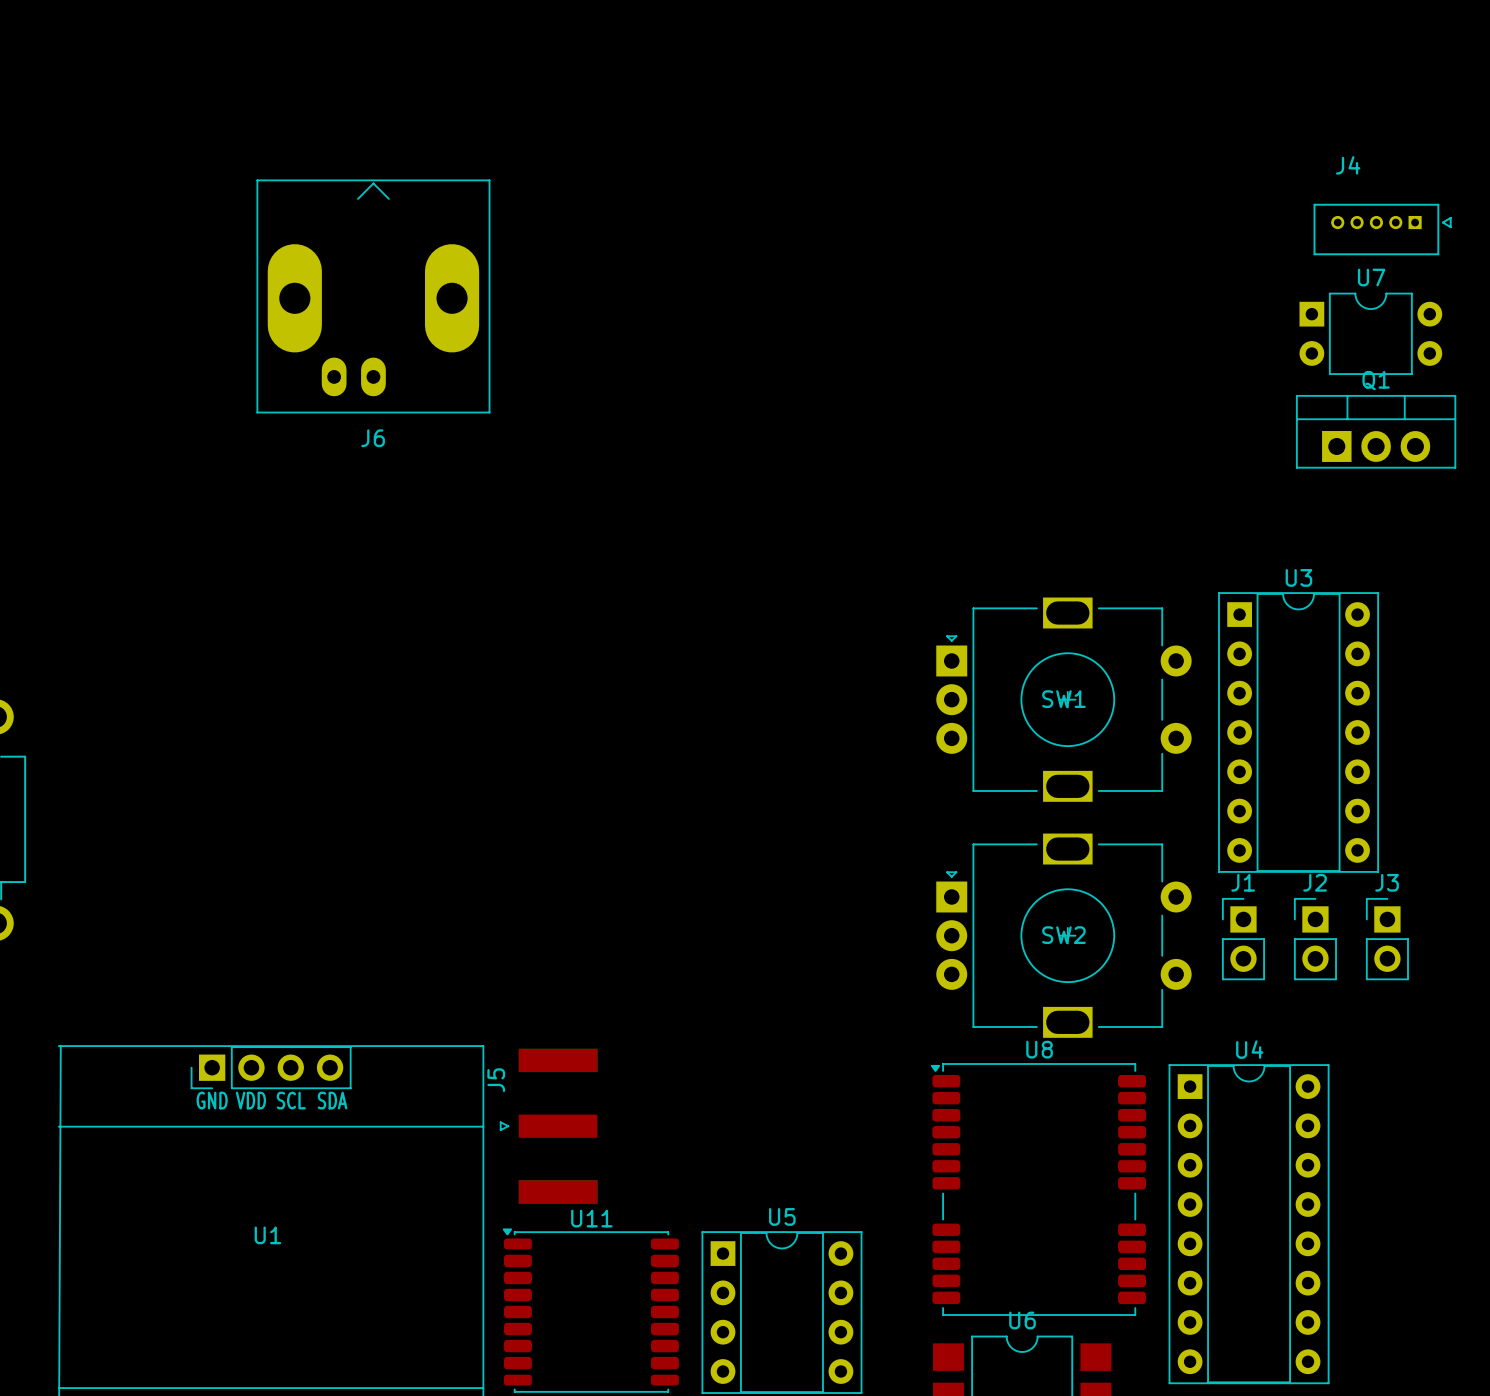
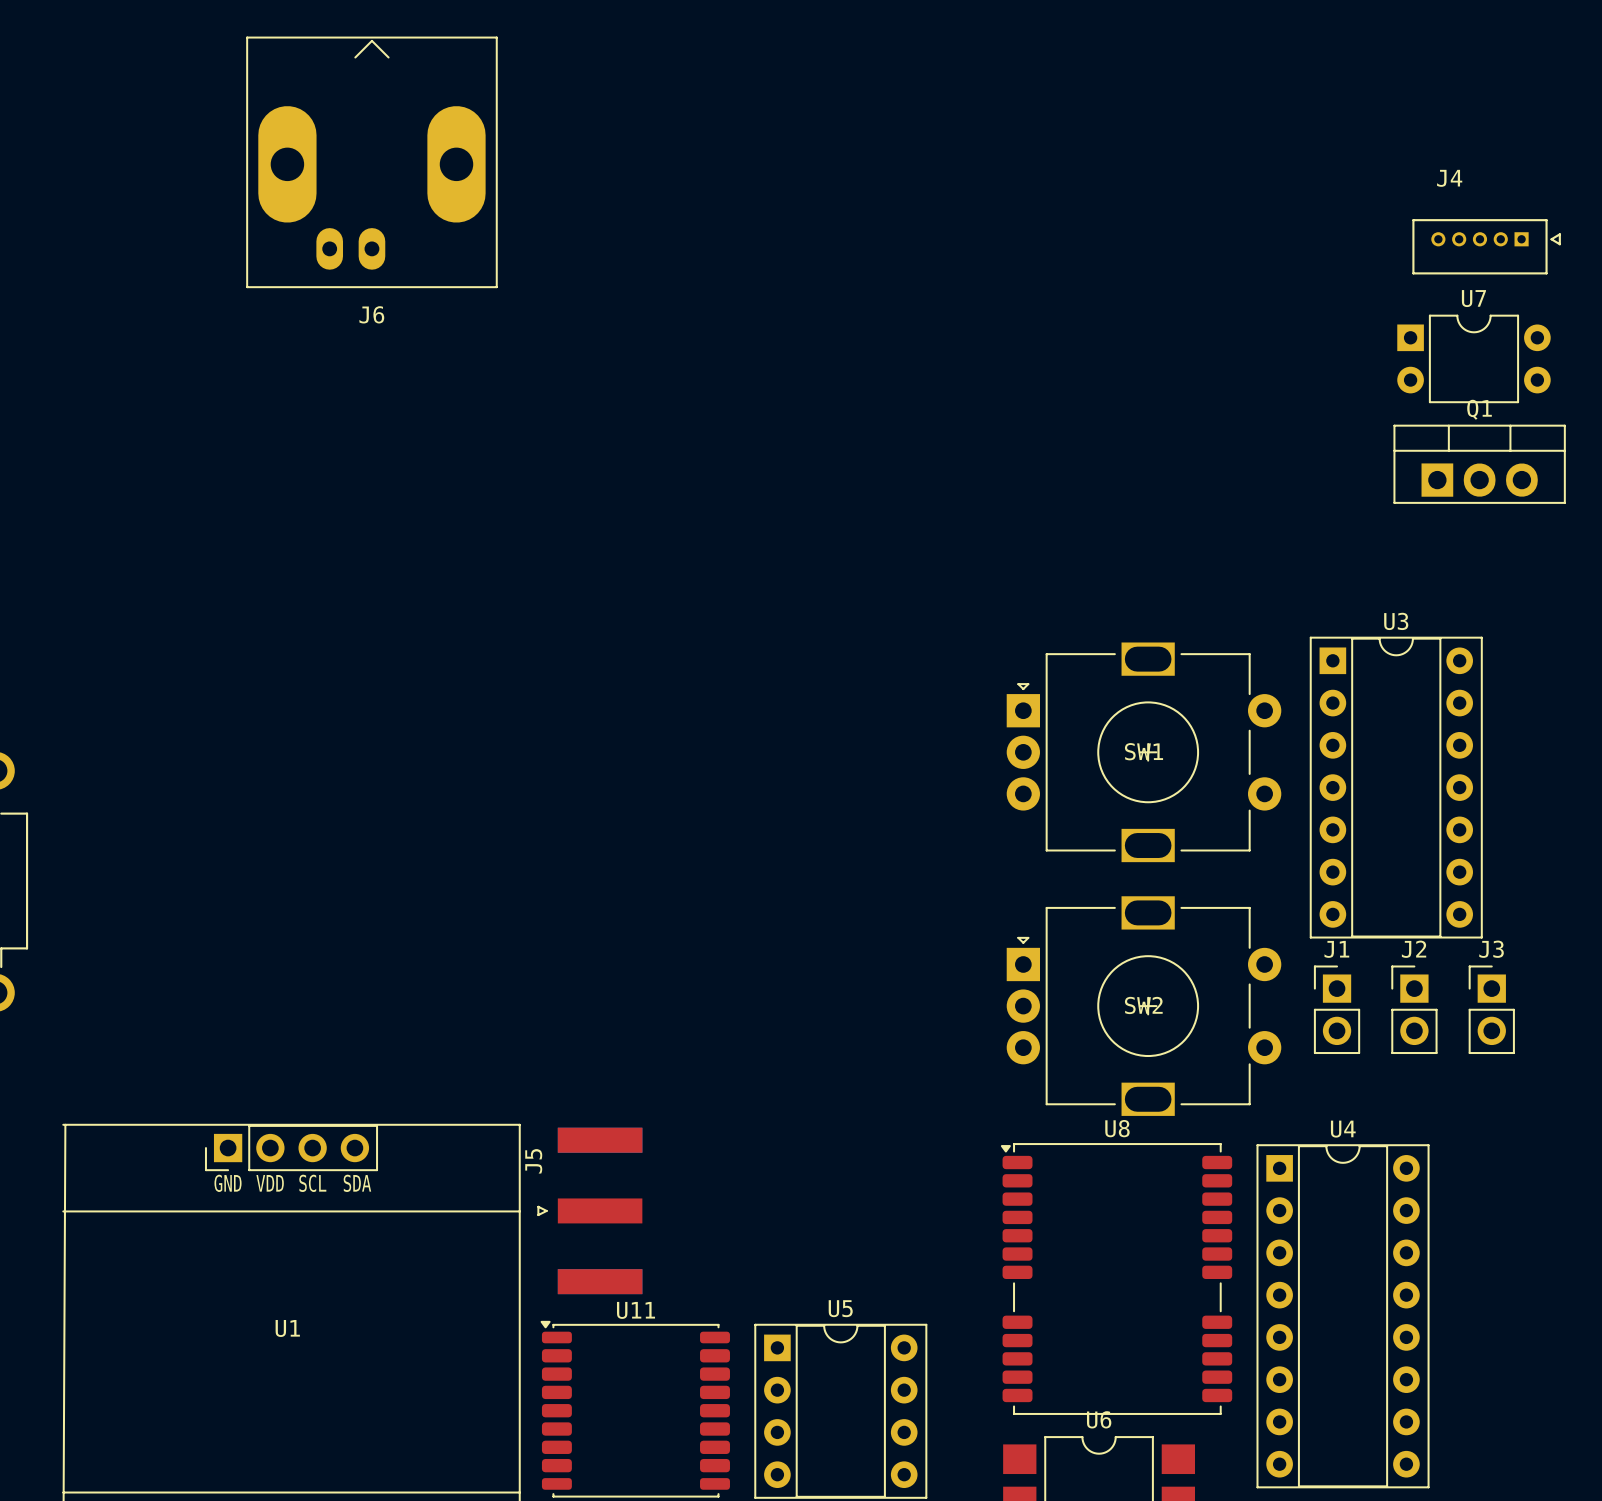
J6 position: (373, 296) -> (371, 162)

